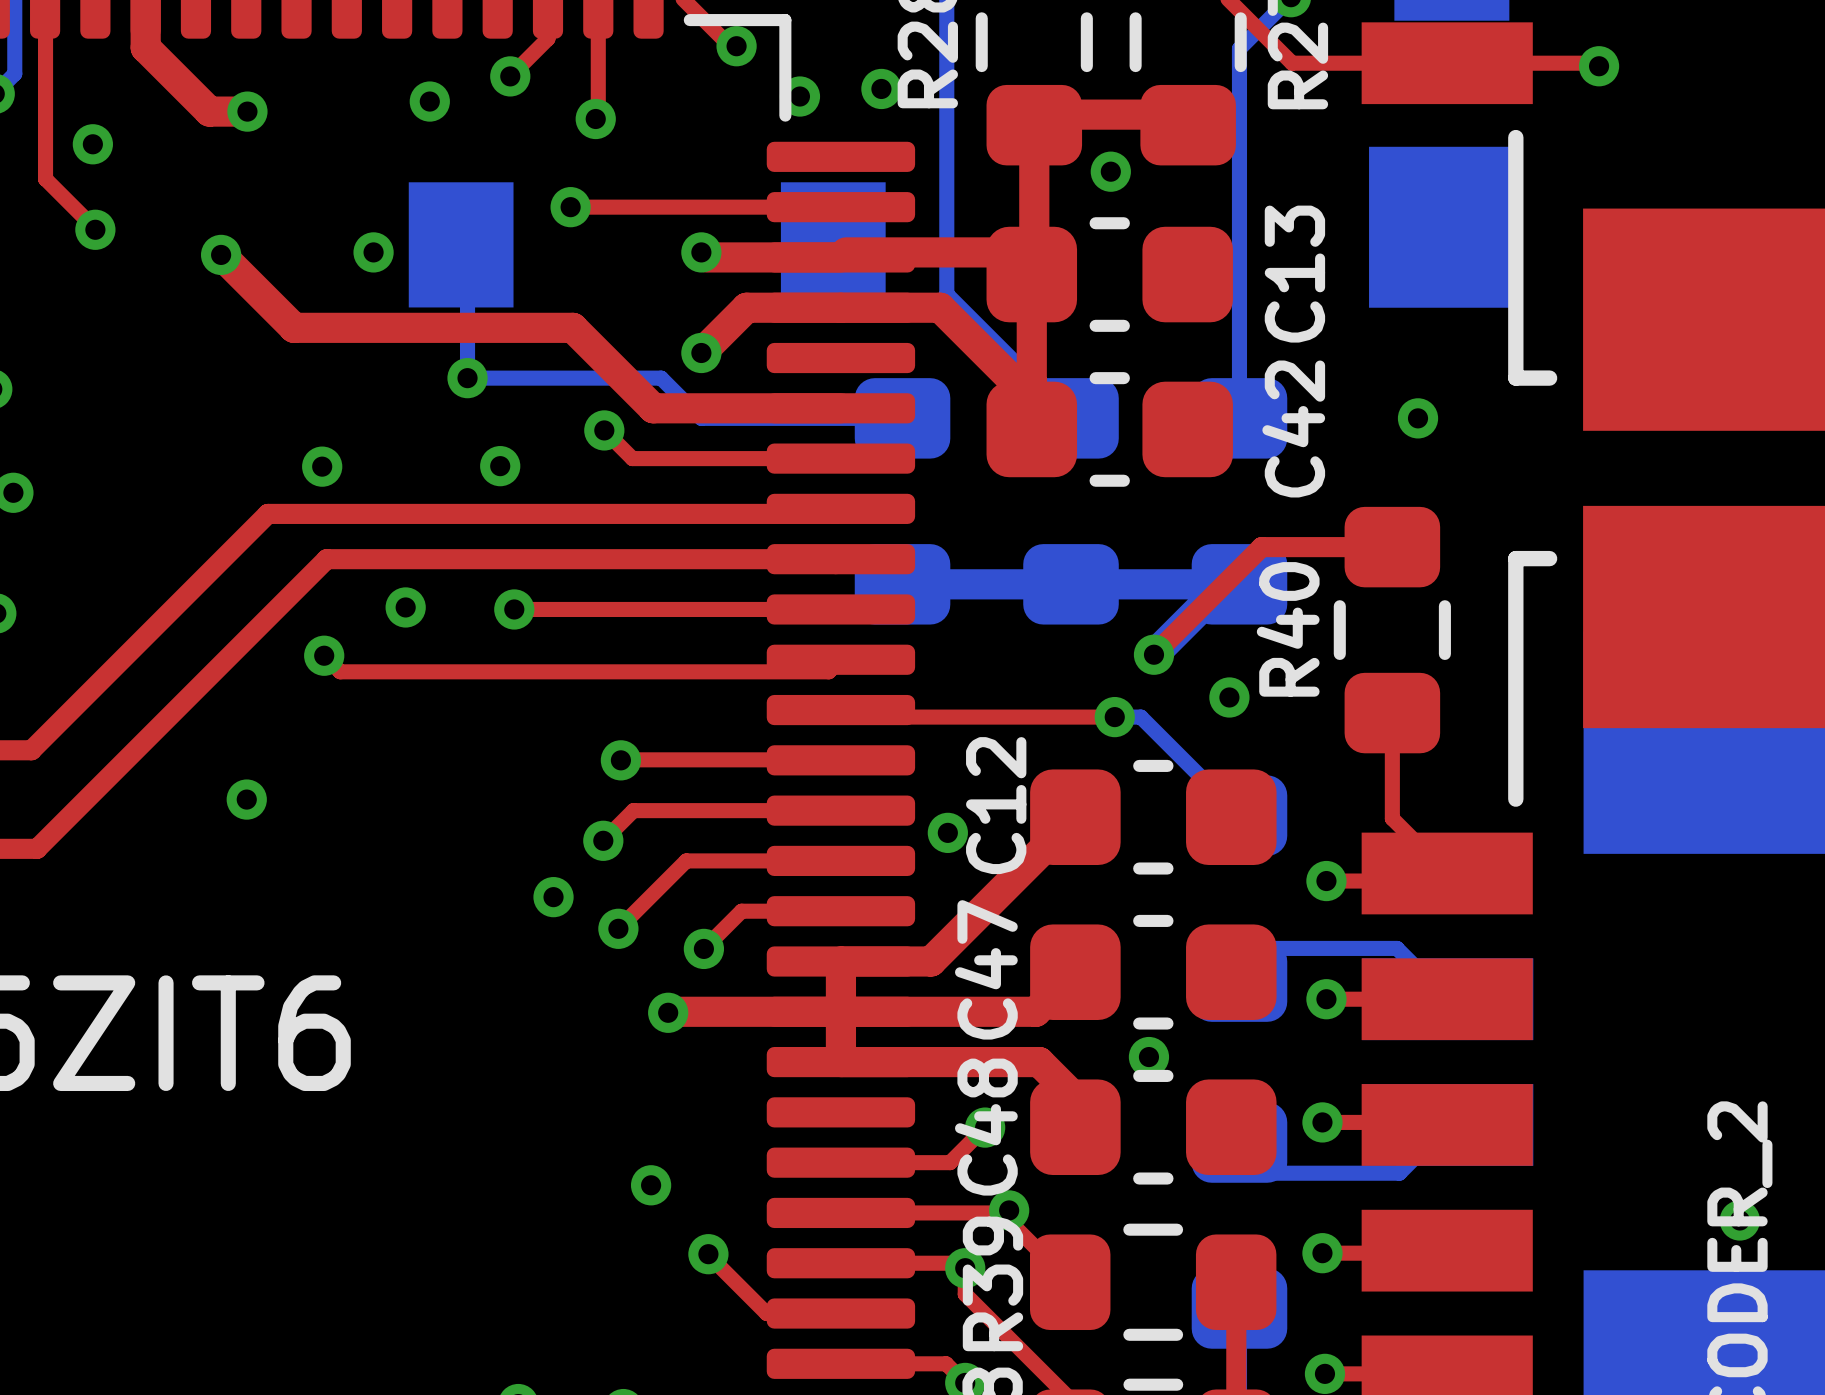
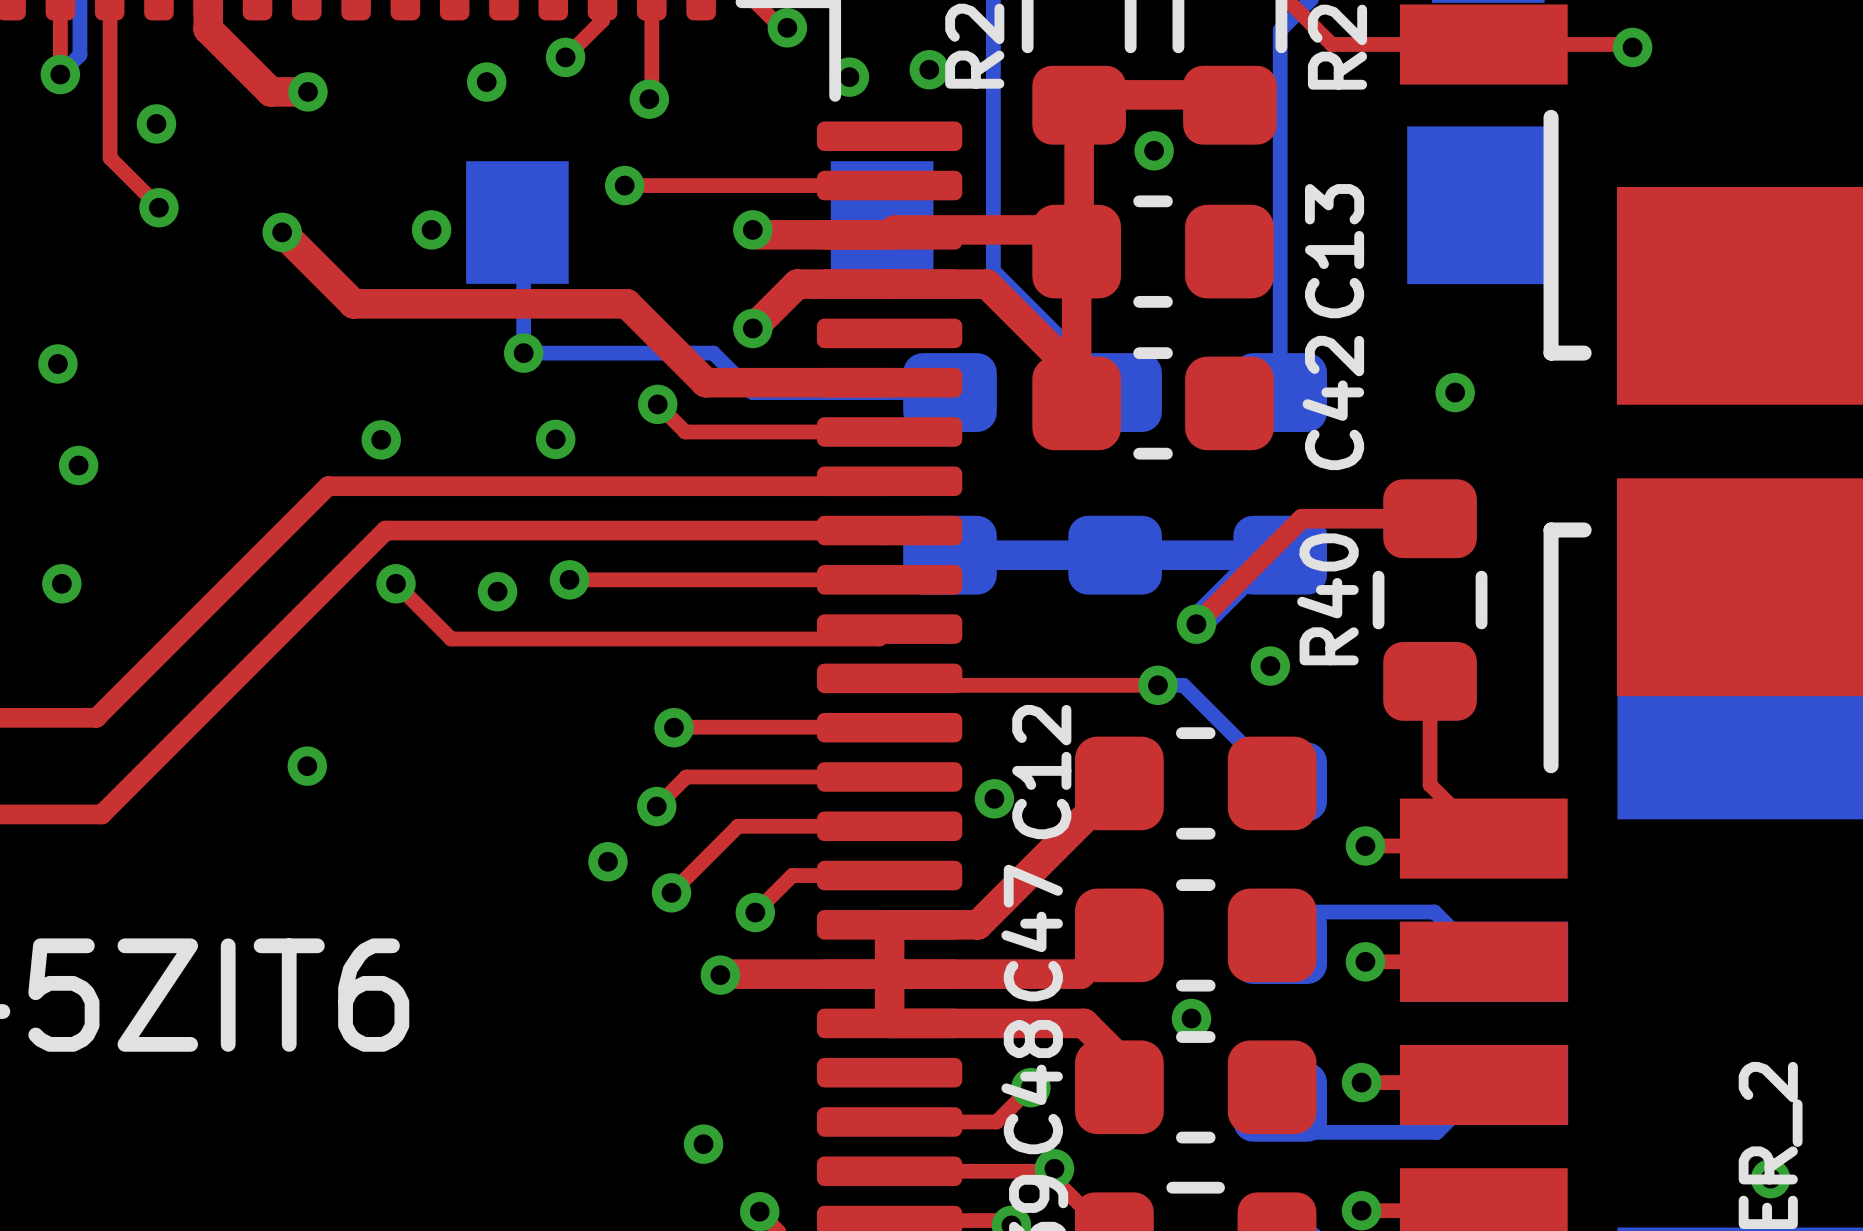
via position: (405, 607) -> (497, 591)
via: none -> (396, 583)
top track: (324, 655) (340, 671) (828, 671) (830, 669) -> (396, 583) (451, 638) (879, 638)
via: (324, 655) -> none

